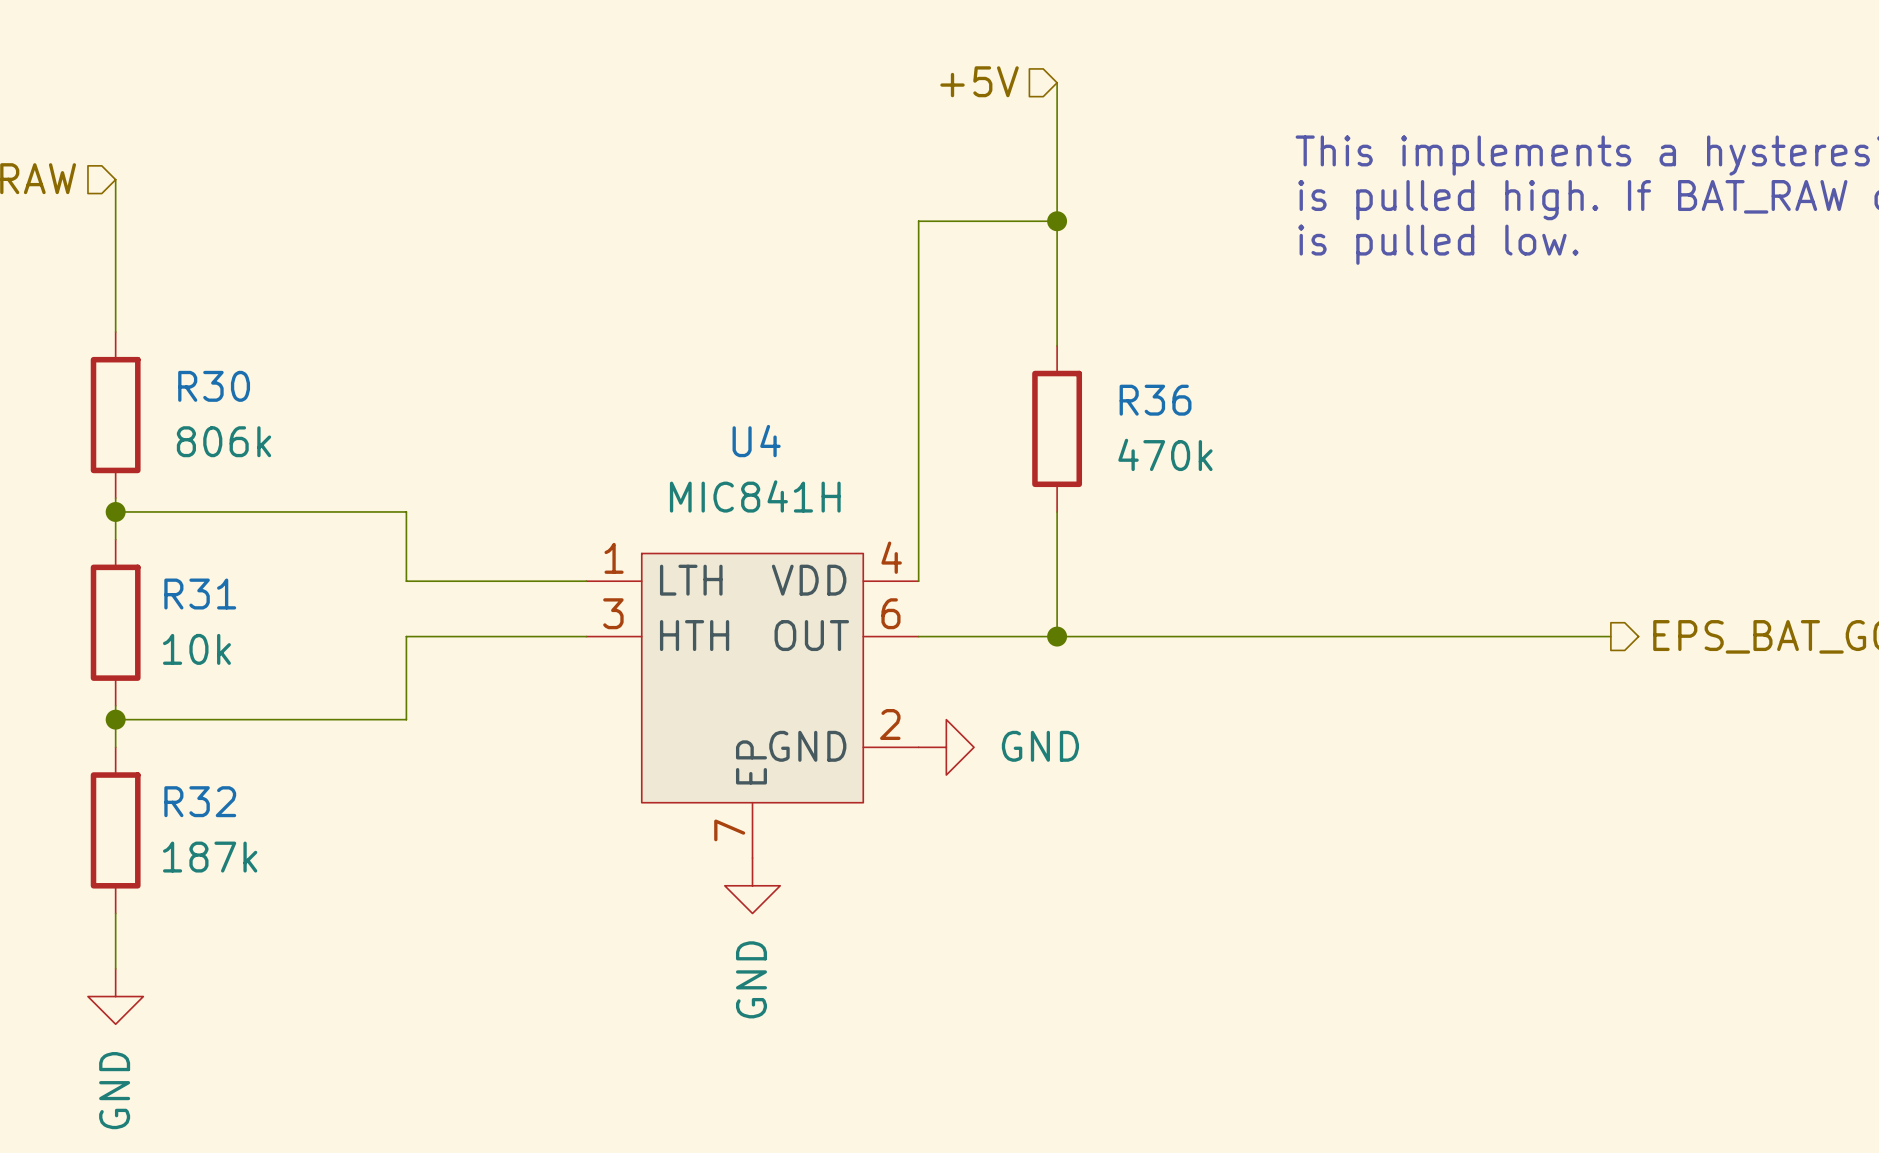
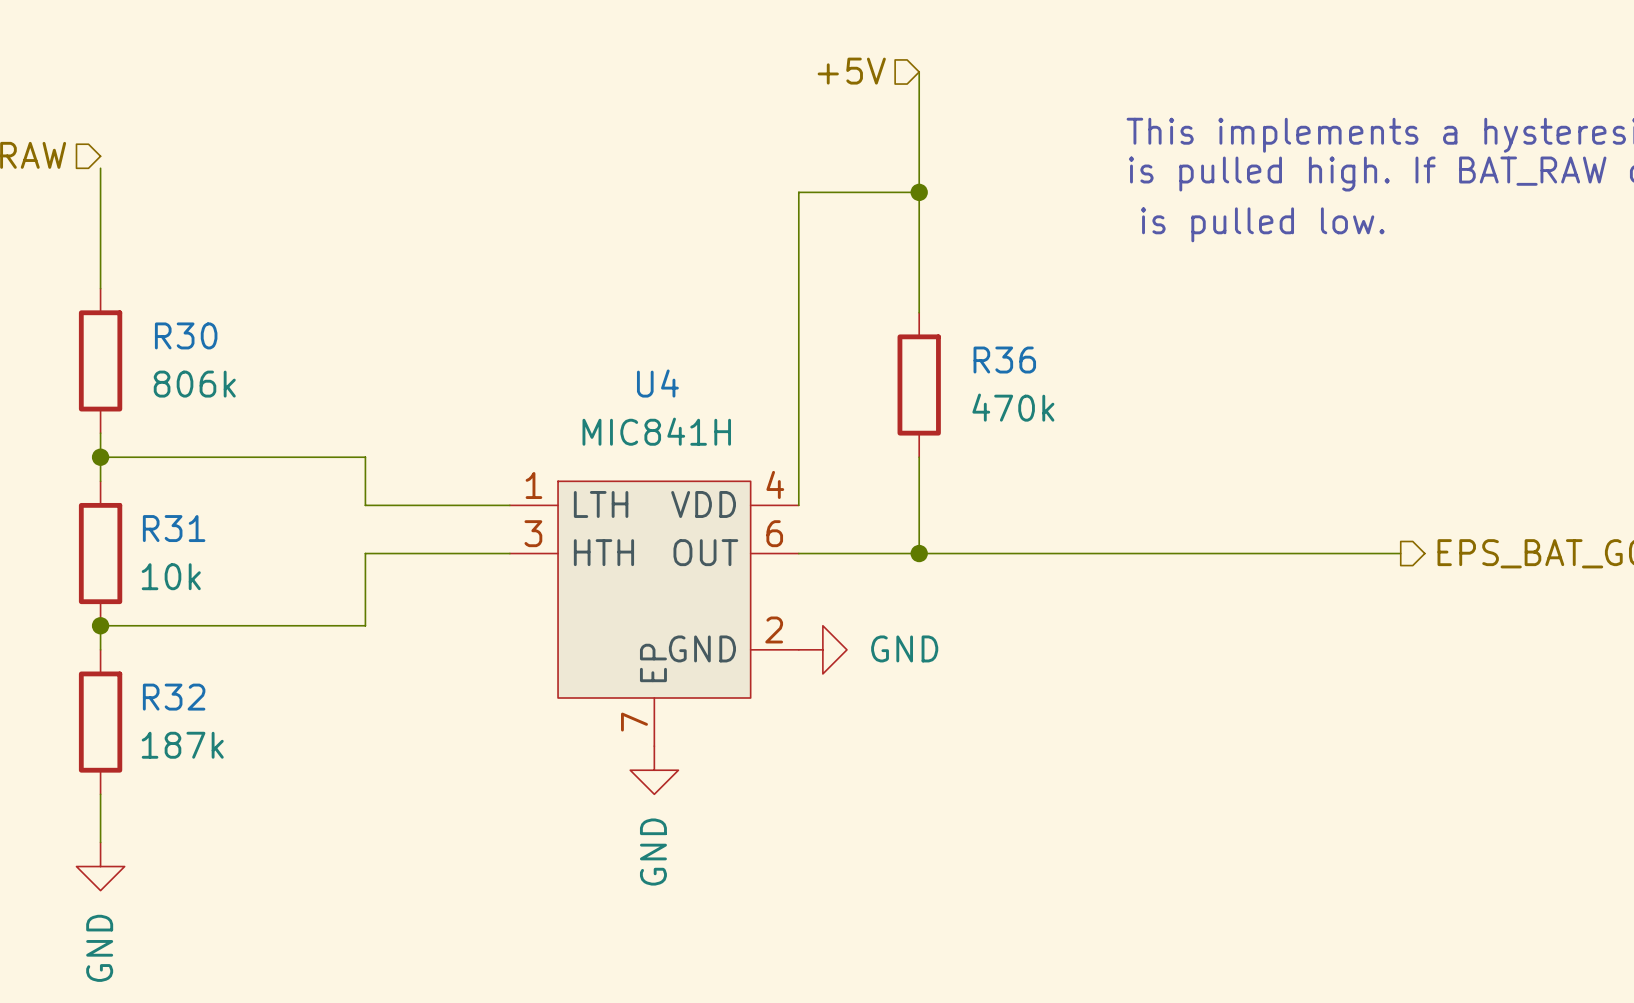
wire: (115, 179) (115, 193) -> none
text position: is pulled low. (1438, 244) -> is pulled low. (1262, 224)
R36 position: (1057, 428) -> (919, 384)
wire: (115, 511) (406, 511) (406, 581) (420, 581) -> (100, 457) (365, 457) (365, 505)
junction position: (115, 511) -> (100, 457)
R31 position: (115, 622) -> (100, 553)
wire: (420, 636) (406, 636) (406, 719) -> (365, 553) (365, 625) (353, 625)

